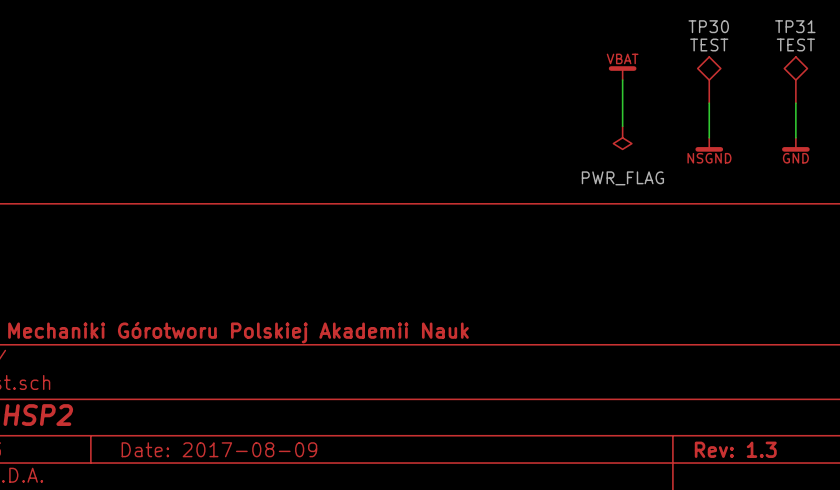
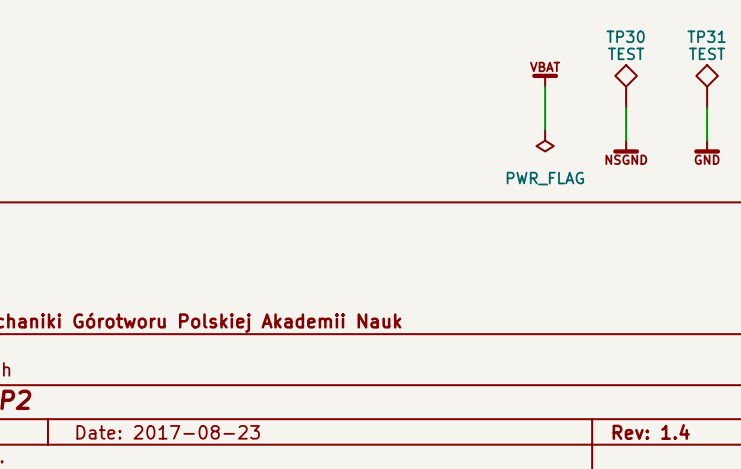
title block: Date: 2017-08-09 (219, 449) -> Date: 2017-08-23 (168, 432)
title block: Rev: 1.3 (735, 449) -> Rev: 1.4 (651, 432)

